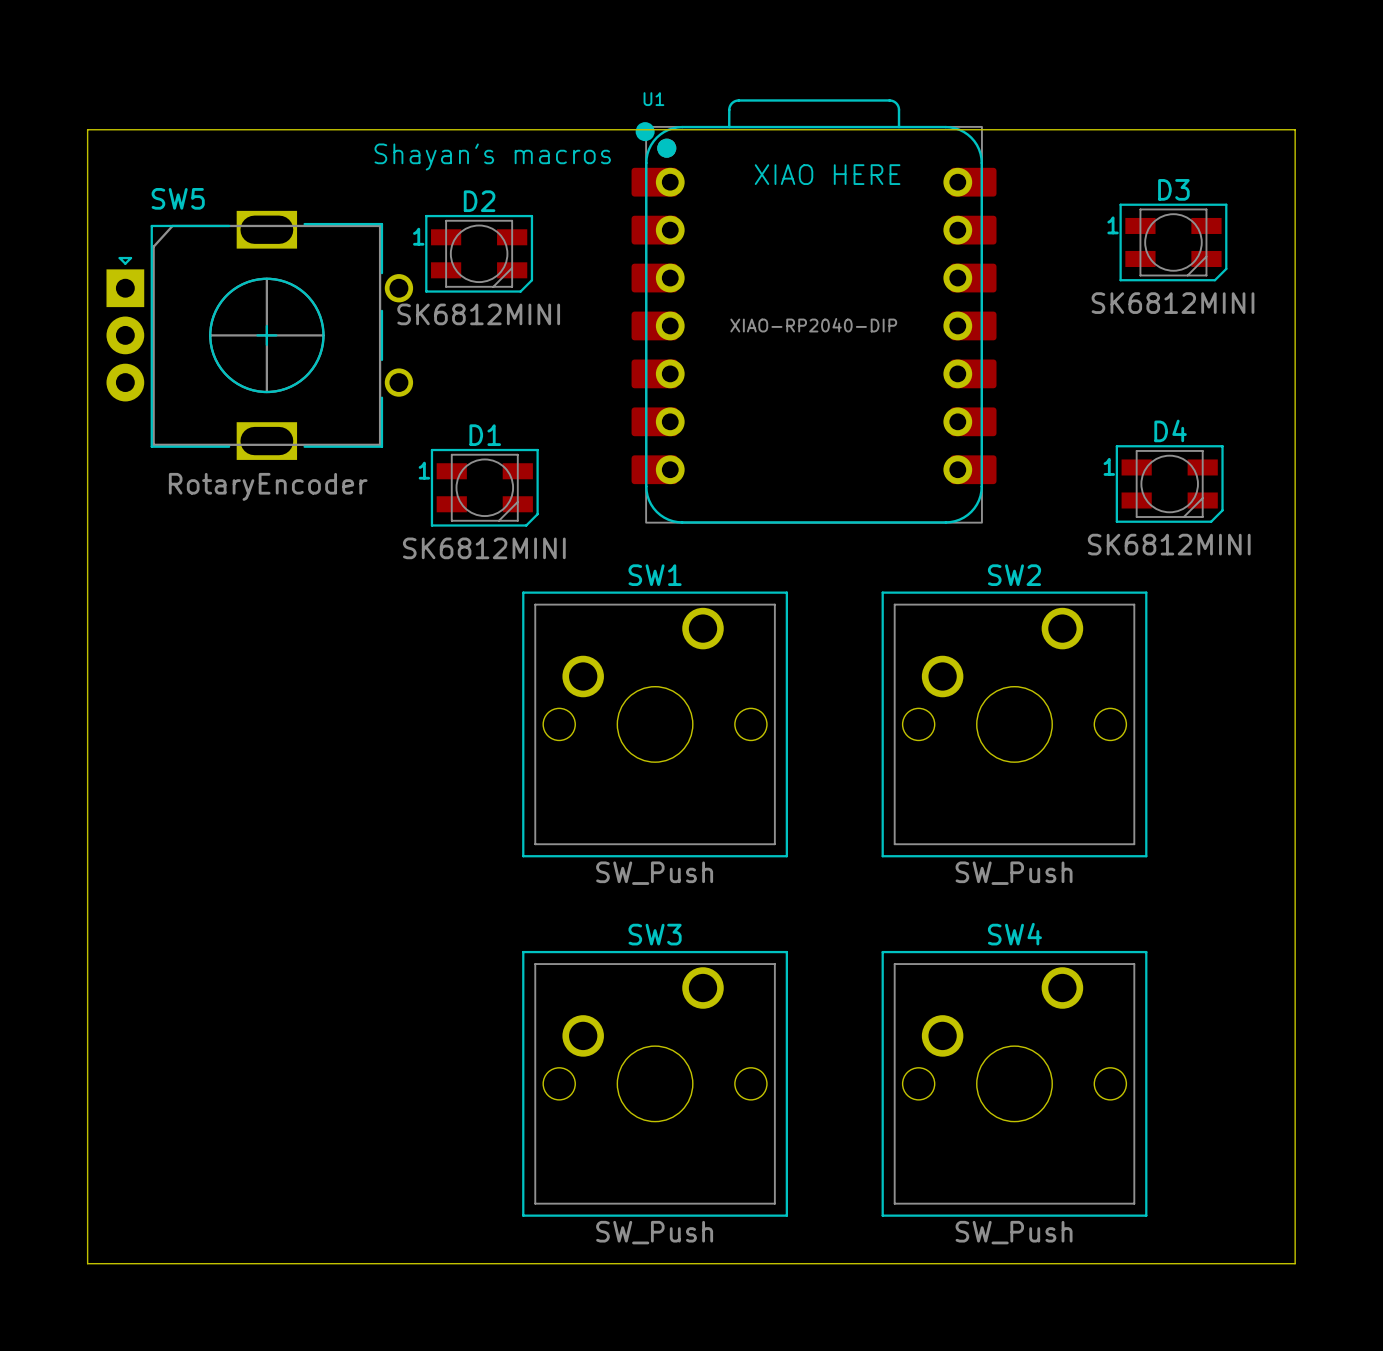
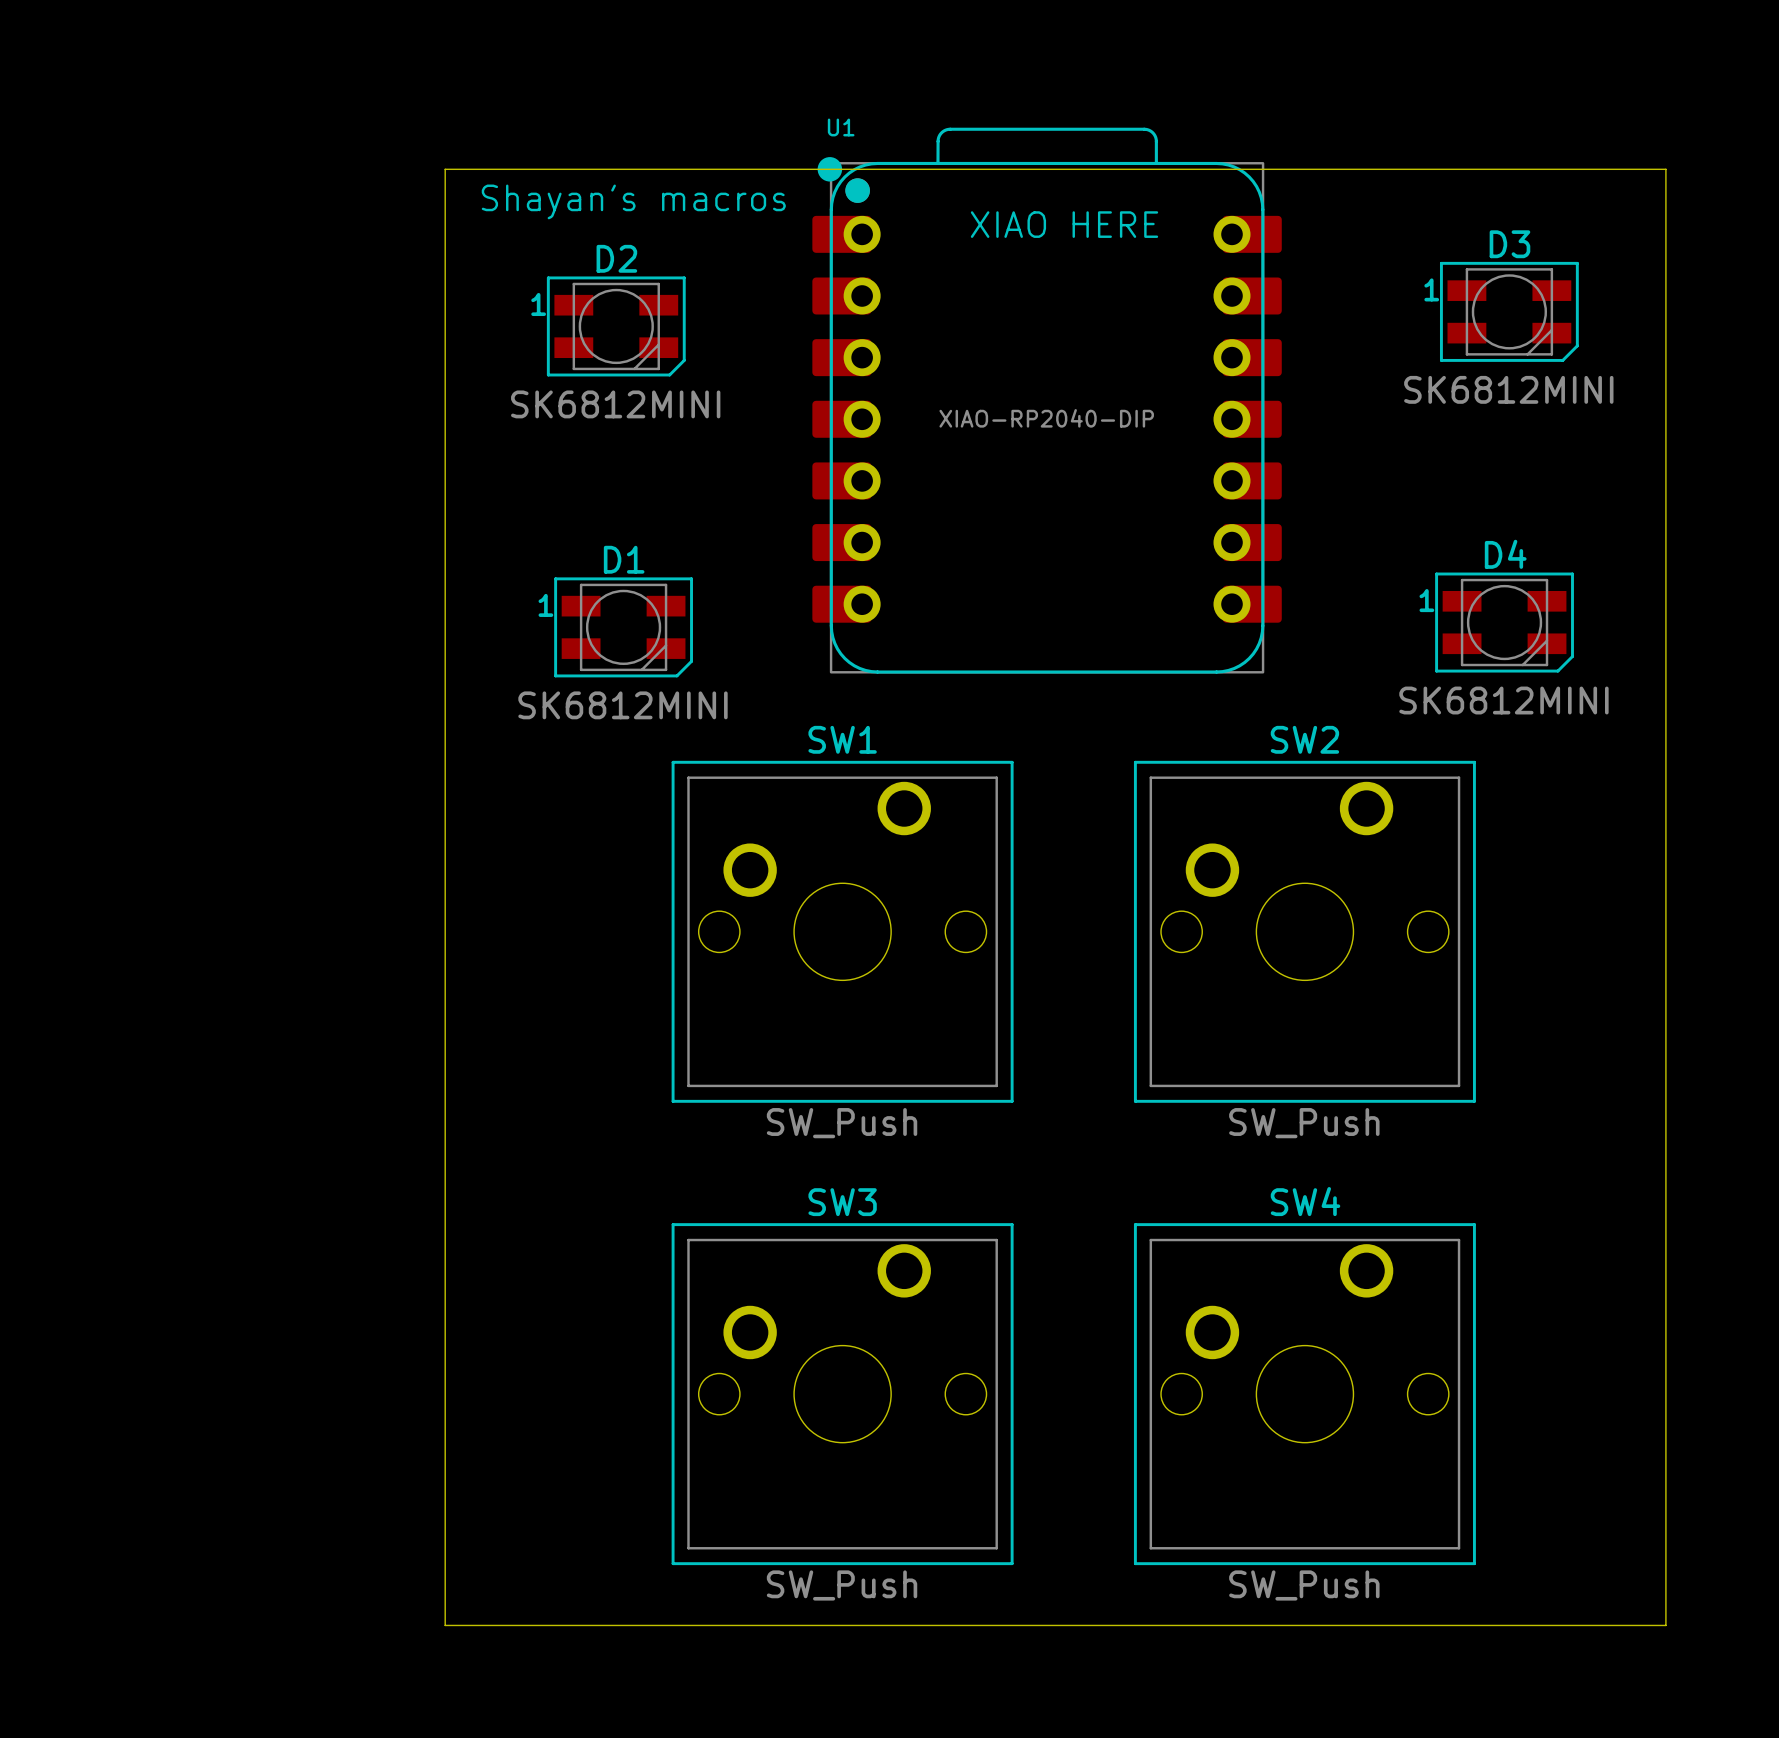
board edge: (1295, 131) (1295, 129) (87, 129) (87, 1263) (346, 1263) -> (1665, 169) (445, 169) (445, 1625)
SW5: RotaryEncoder (259, 335) -> none

